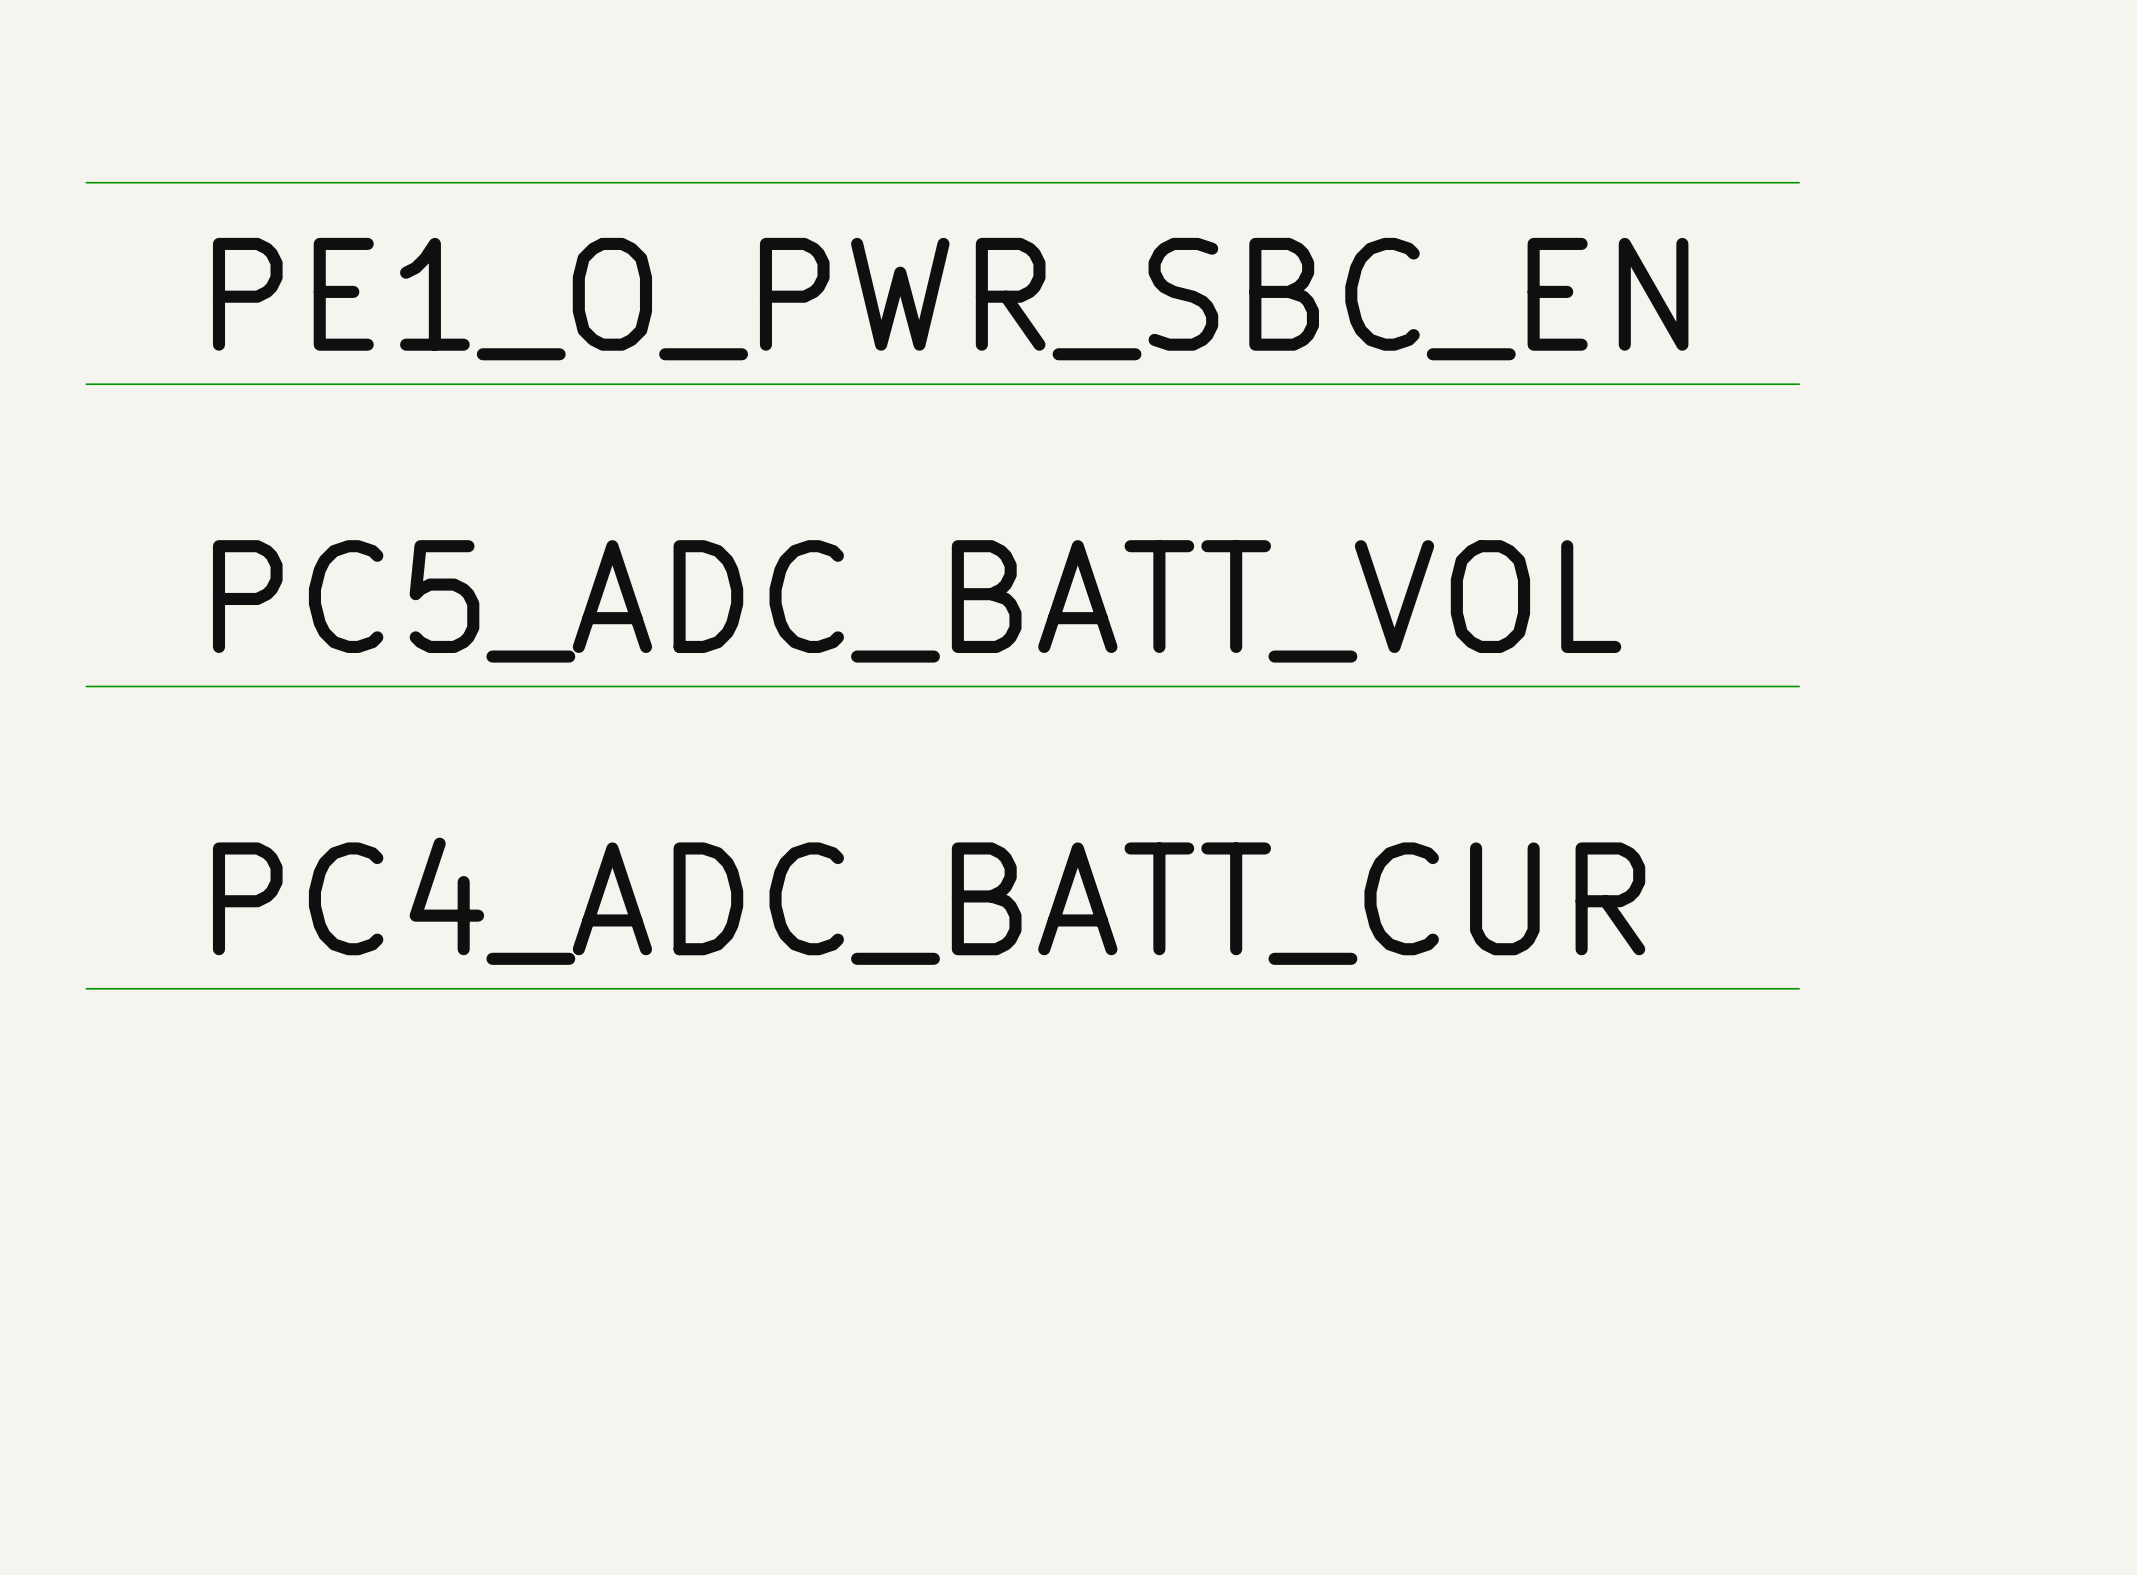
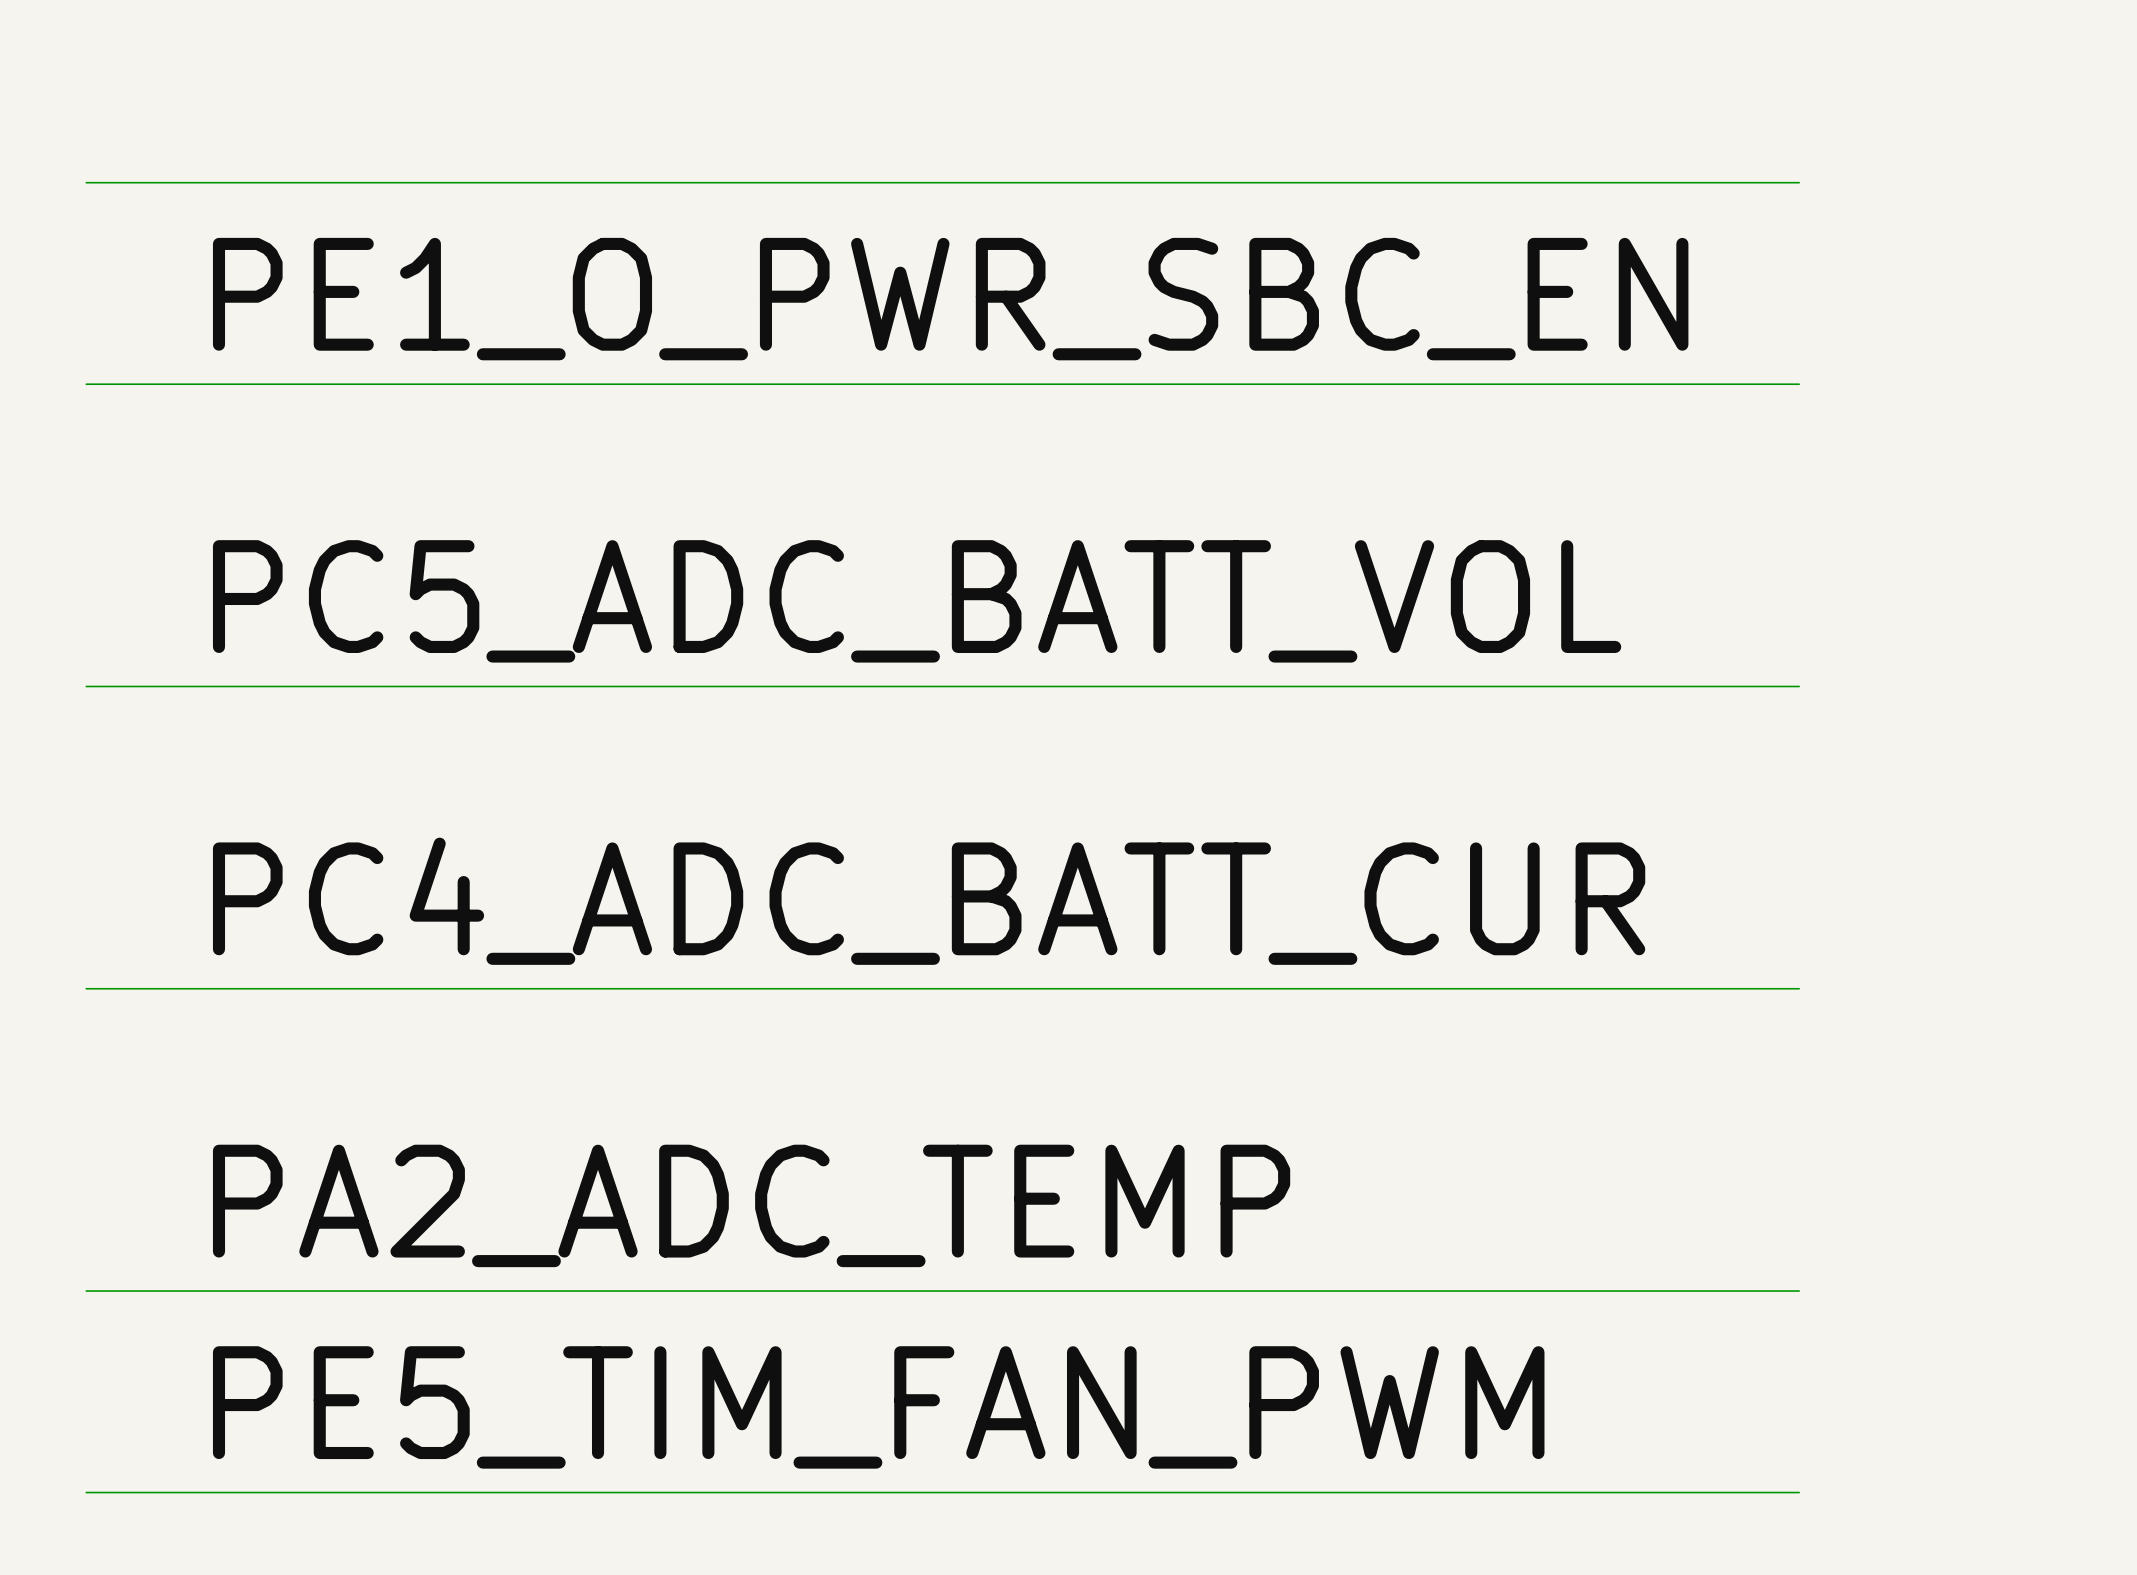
label: none -> PA2_ADC_TEMP (751, 1205)
wire: none -> (86, 1291) (1799, 1291)
label: none -> PE5_TIM_FAN_PWM (878, 1407)
wire: none -> (86, 1492) (1799, 1492)

